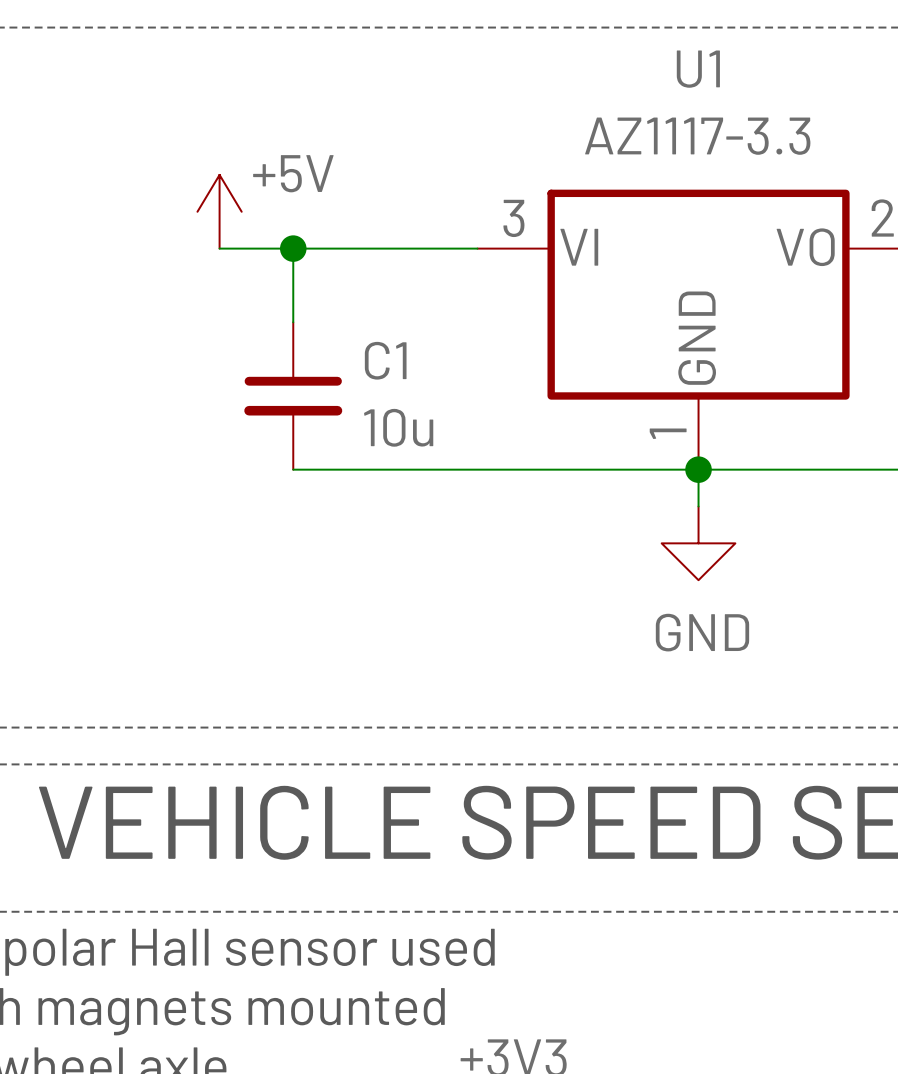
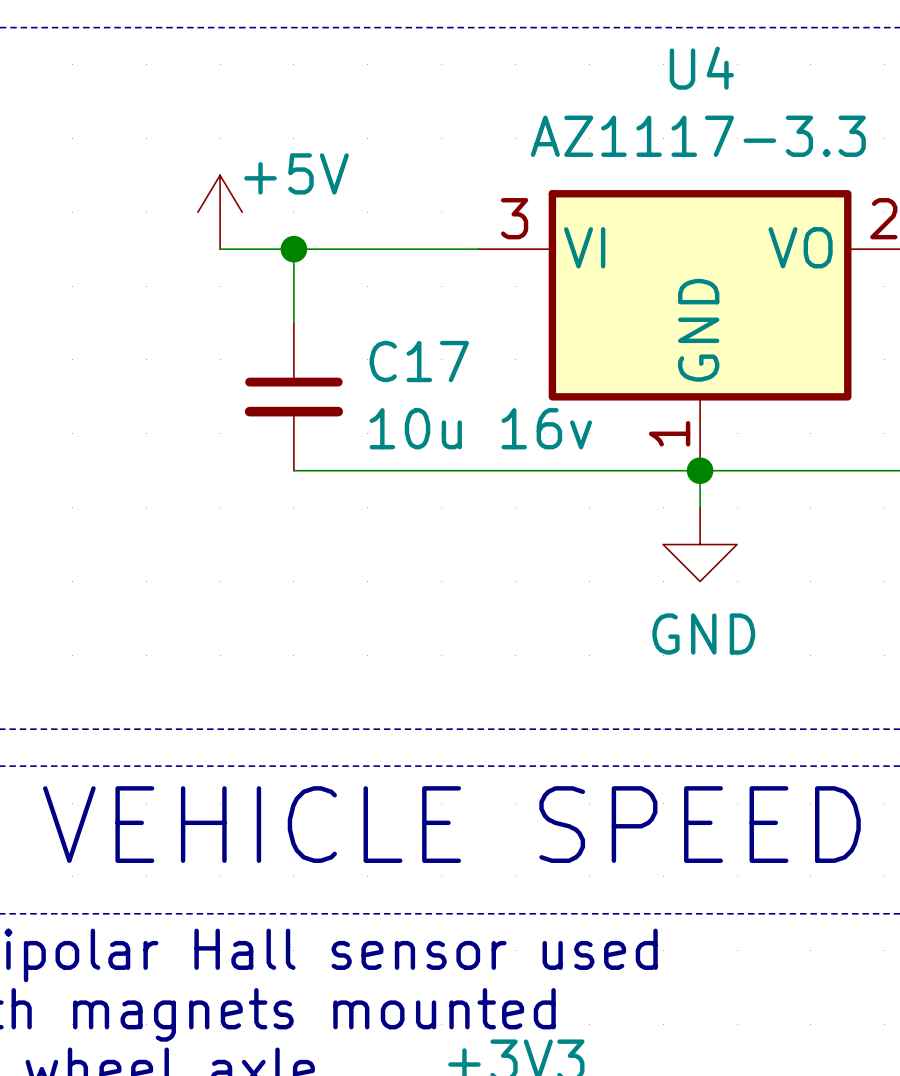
U1 name: U1 (698, 69) -> U4 (701, 68)
C1 name: C1 (385, 360) -> C17 (419, 361)
C1 value: 10u (398, 427) -> 10u 16v (480, 428)

